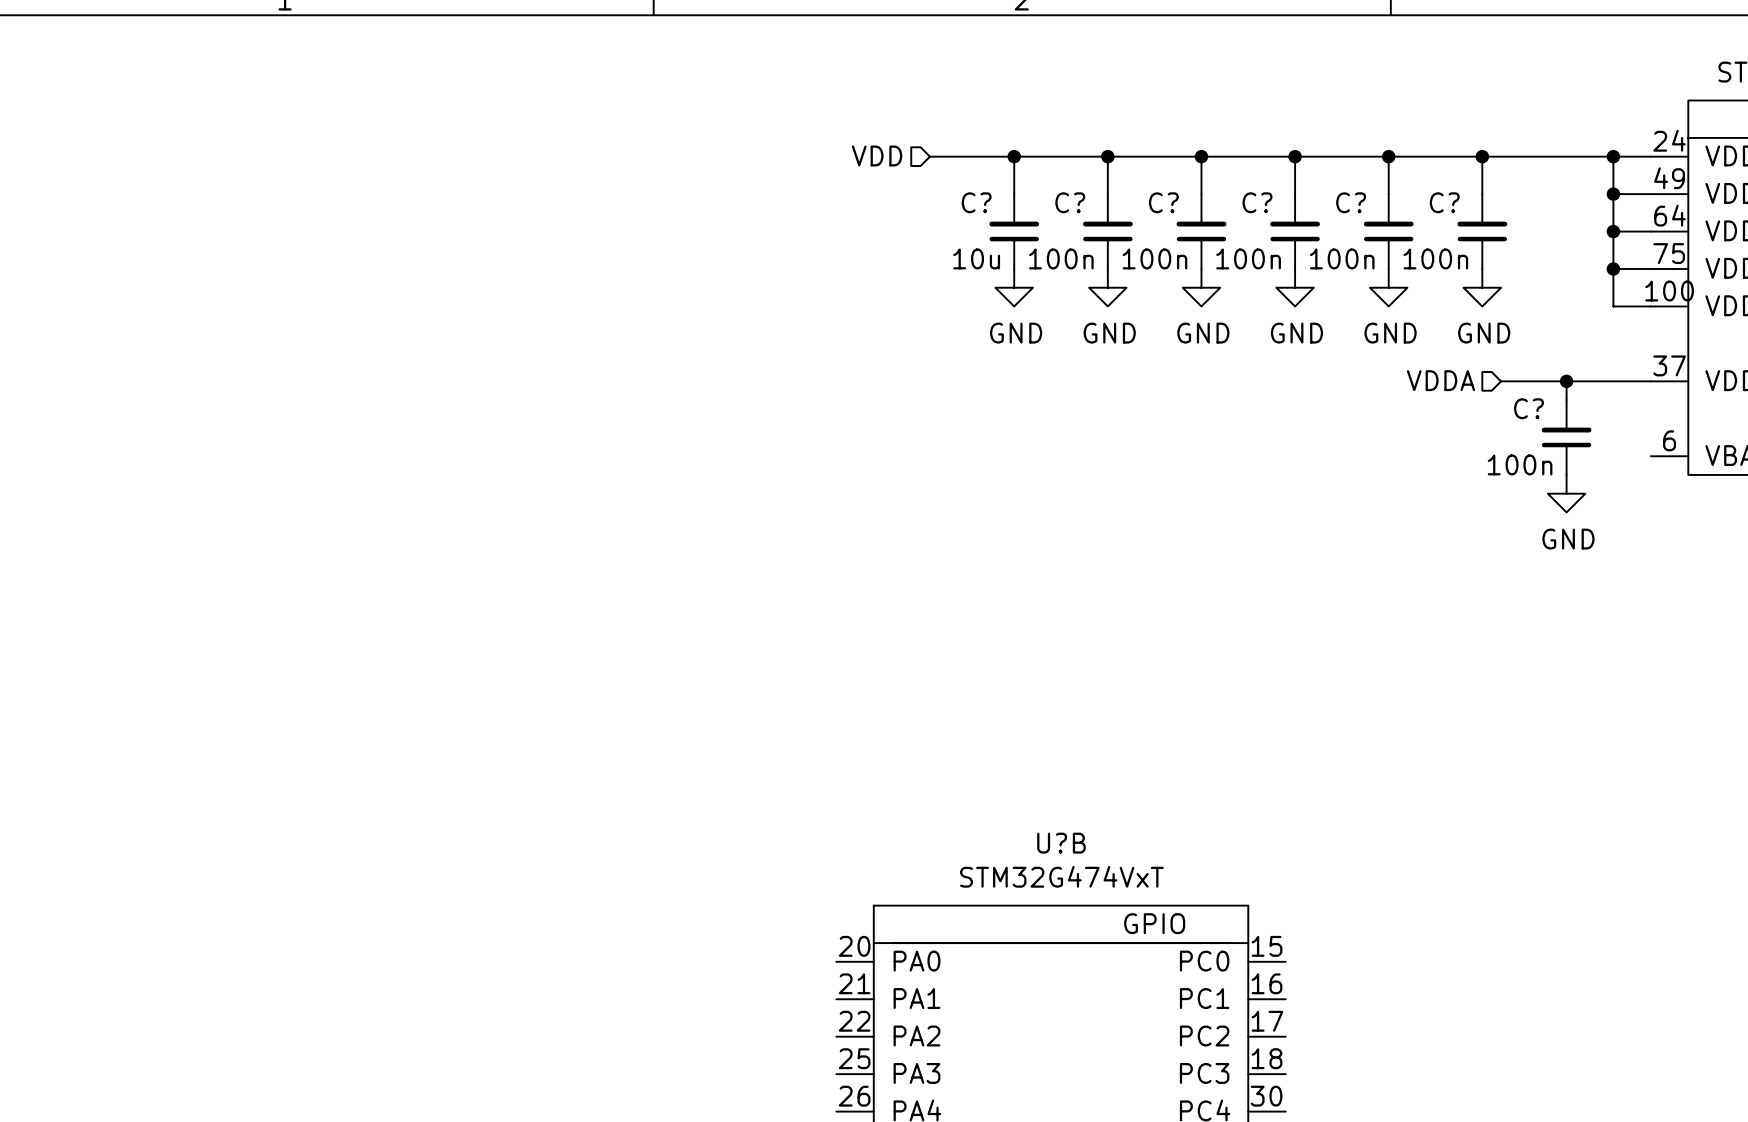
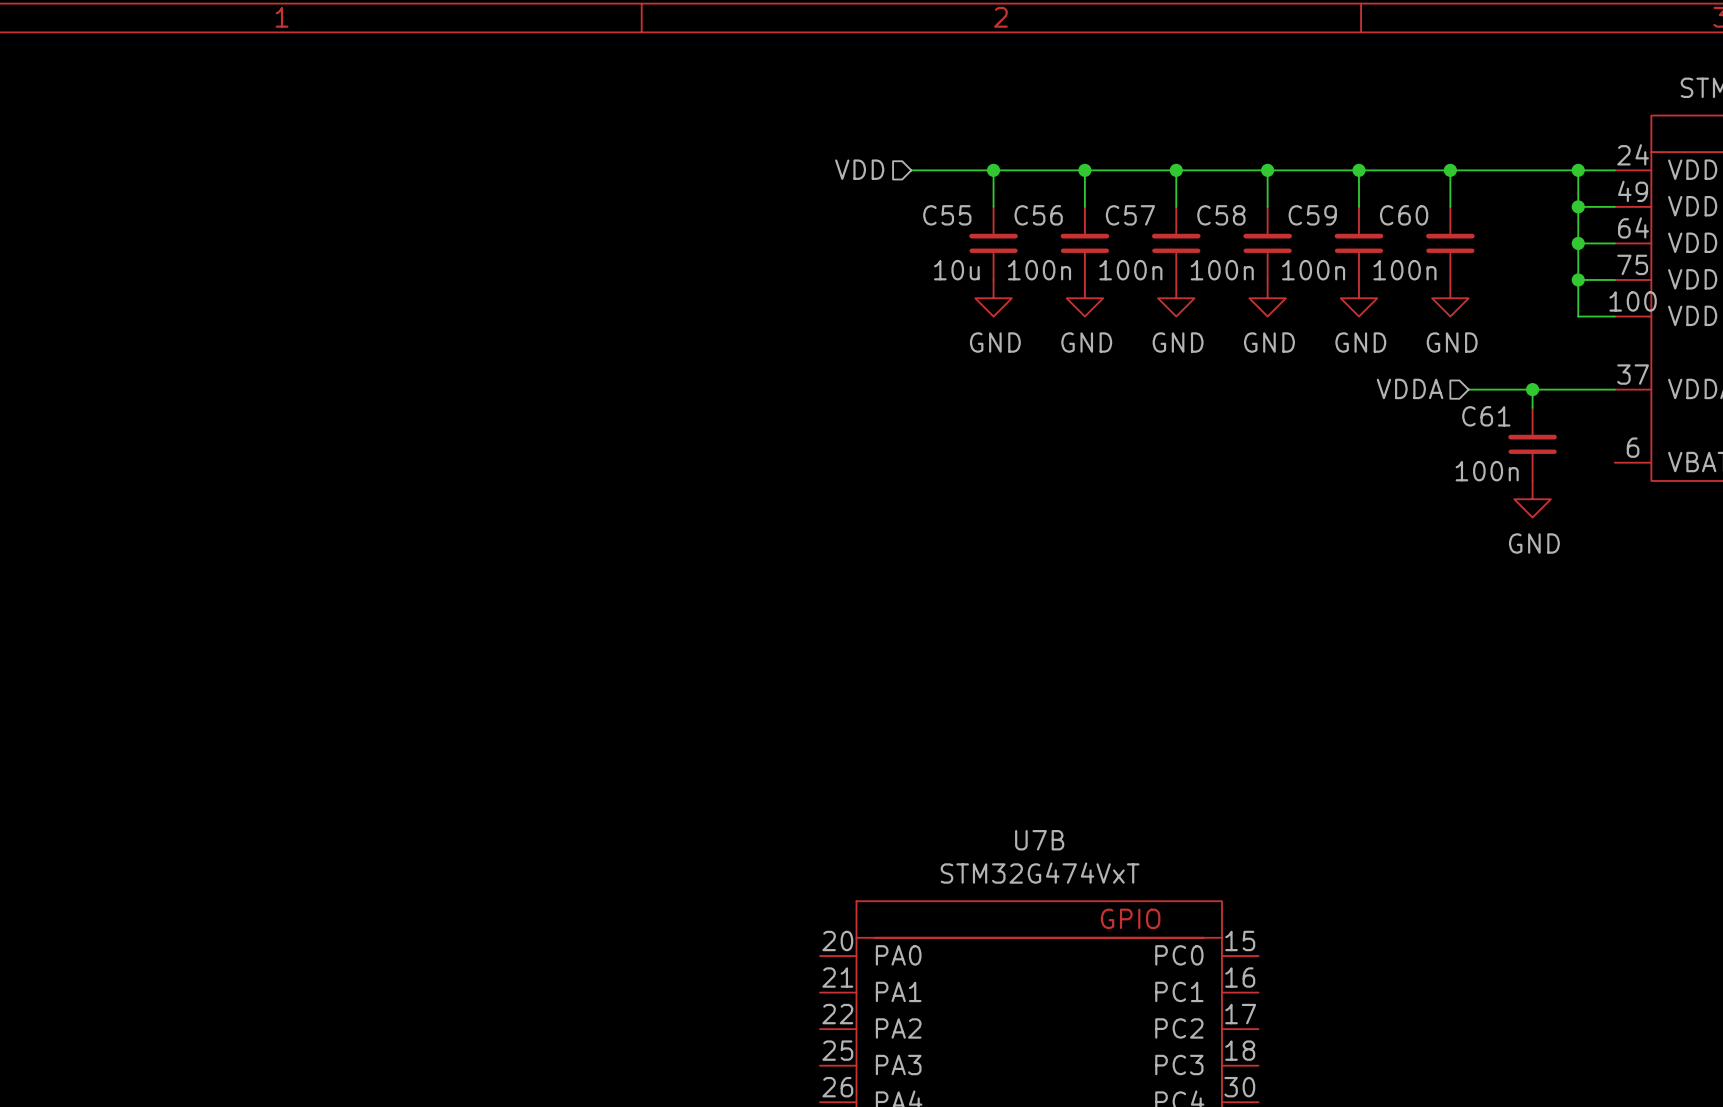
C? name: C? (976, 202) -> C55 (947, 215)
C? name: C? (1070, 202) -> C56 (1038, 215)
C? name: C? (1163, 202) -> C57 (1130, 215)
C? name: C? (1257, 202) -> C58 (1221, 215)
C? name: C? (1351, 202) -> C59 (1312, 215)
C? name: C? (1444, 202) -> C60 (1404, 215)
C? name: C? (1529, 408) -> C61 (1486, 416)
U?B name: U?B (1061, 843) -> U7B (1039, 840)

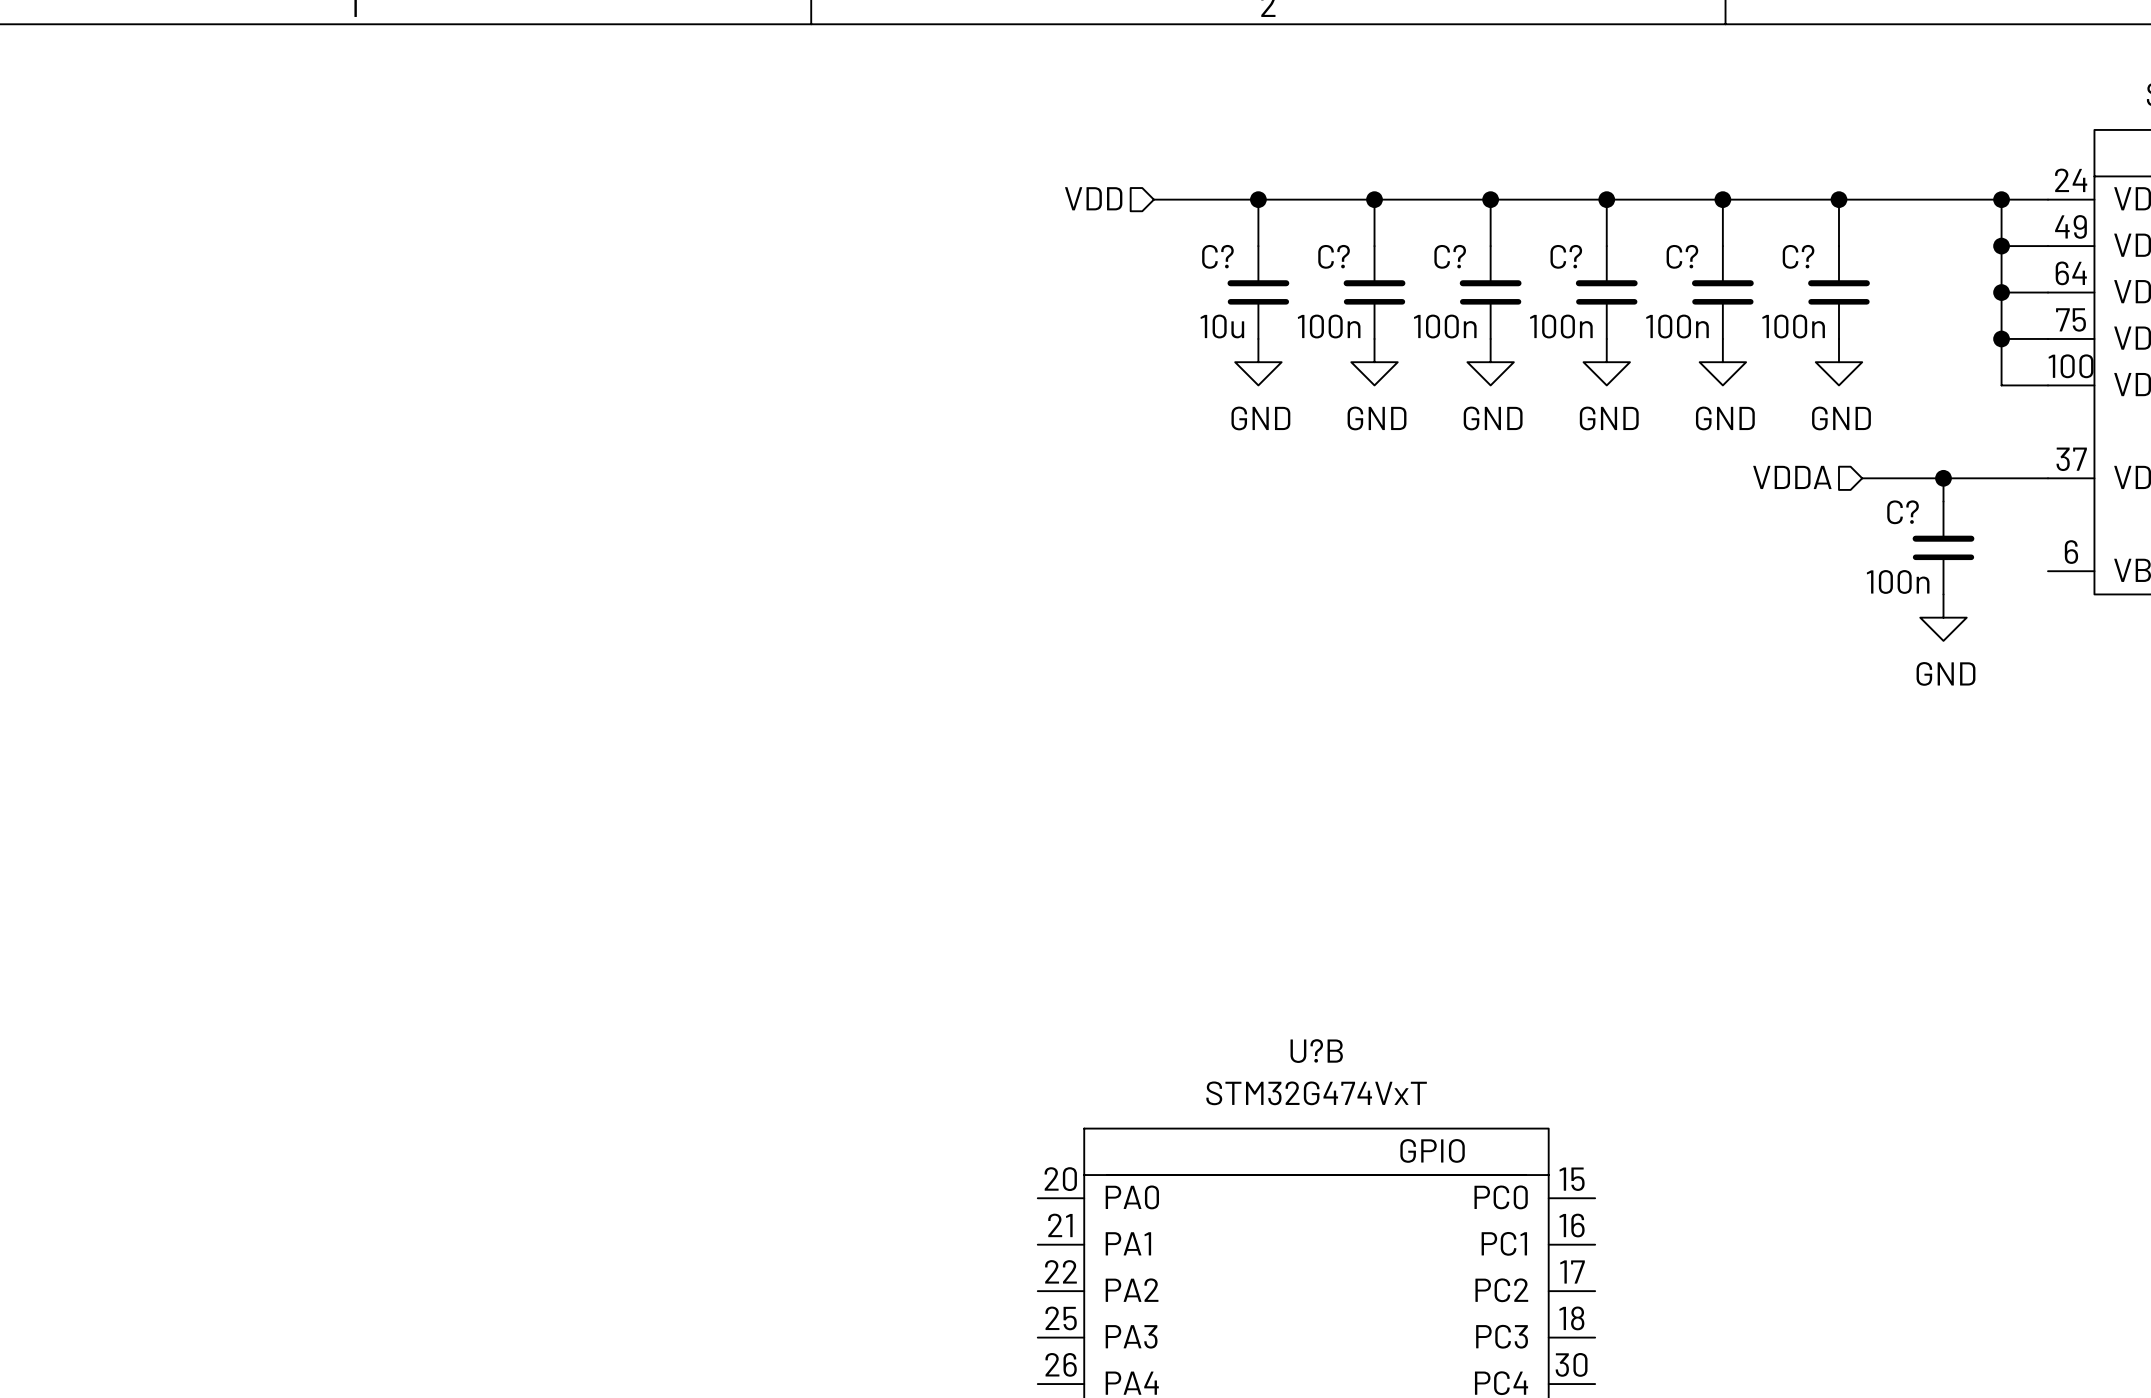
C55 name: C55 (947, 215) -> C? (1217, 256)
C56 name: C56 (1038, 215) -> C? (1334, 256)
C57 name: C57 (1130, 215) -> C? (1450, 256)
C58 name: C58 (1221, 215) -> C? (1566, 256)
C59 name: C59 (1312, 215) -> C? (1682, 256)
C60 name: C60 (1404, 215) -> C? (1798, 256)
C61 name: C61 (1486, 416) -> C? (1903, 512)
U7B name: U7B (1039, 840) -> U?B (1316, 1051)

